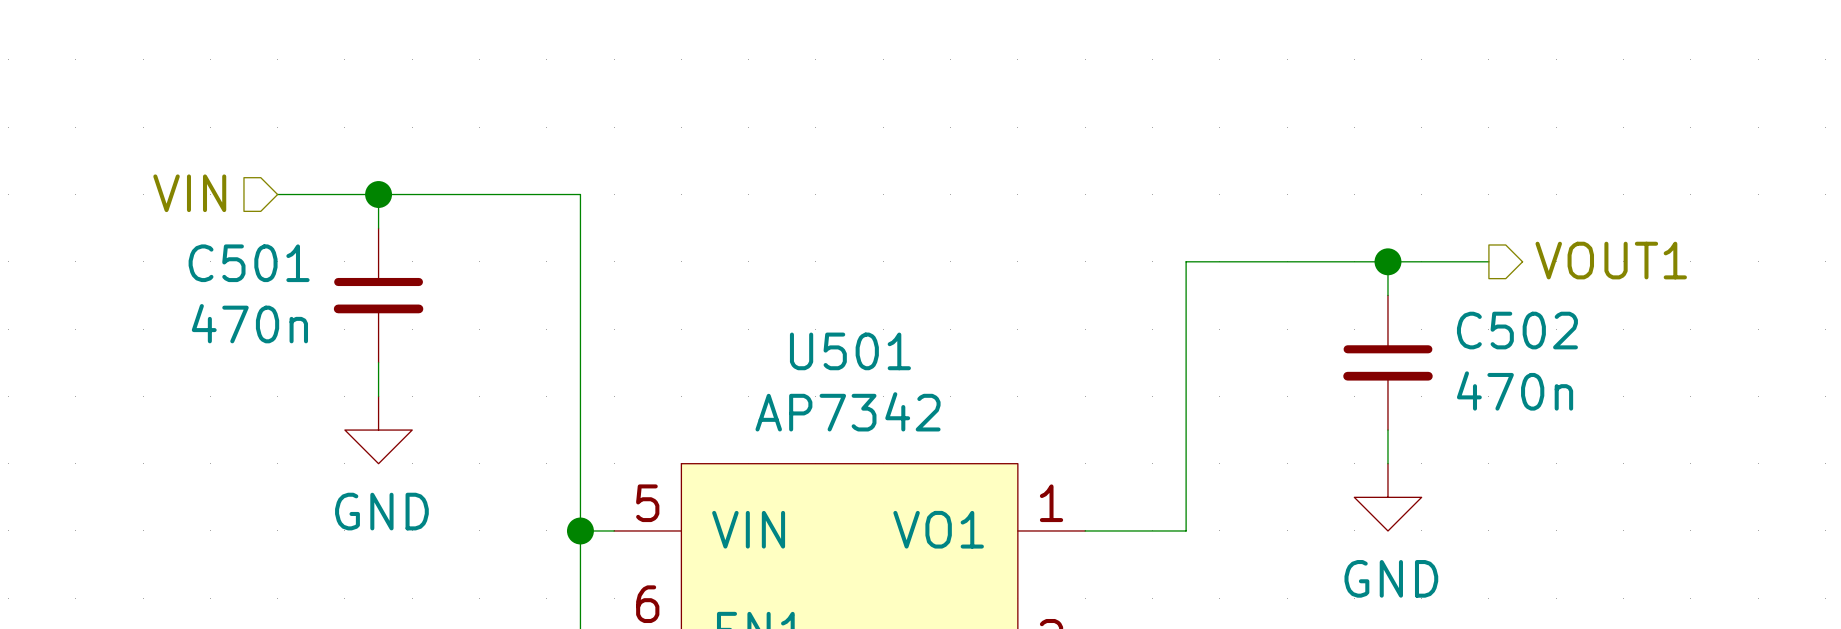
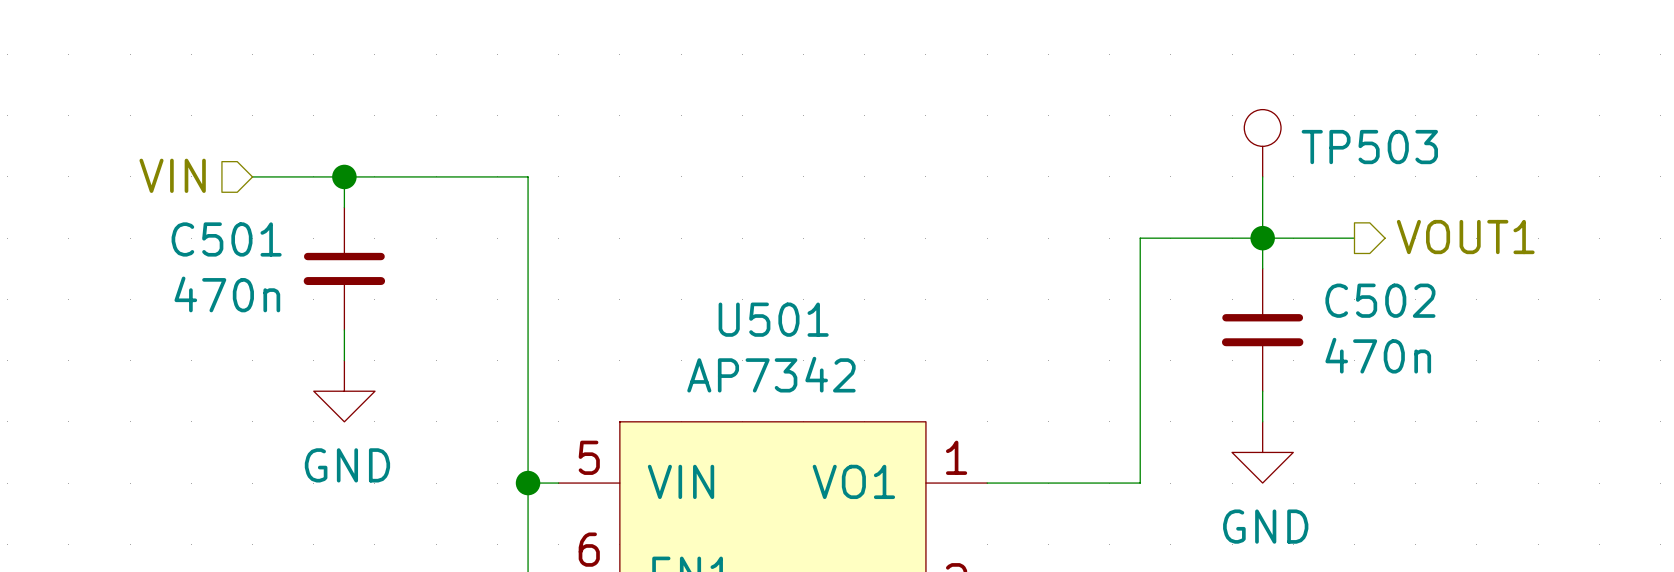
TP503: none -> (1262, 143)
wire: none -> (1262, 176) (1262, 238)
wire: (1253, 261) (1186, 261) (1186, 530) -> (1140, 238) (1140, 483) (1079, 483)

